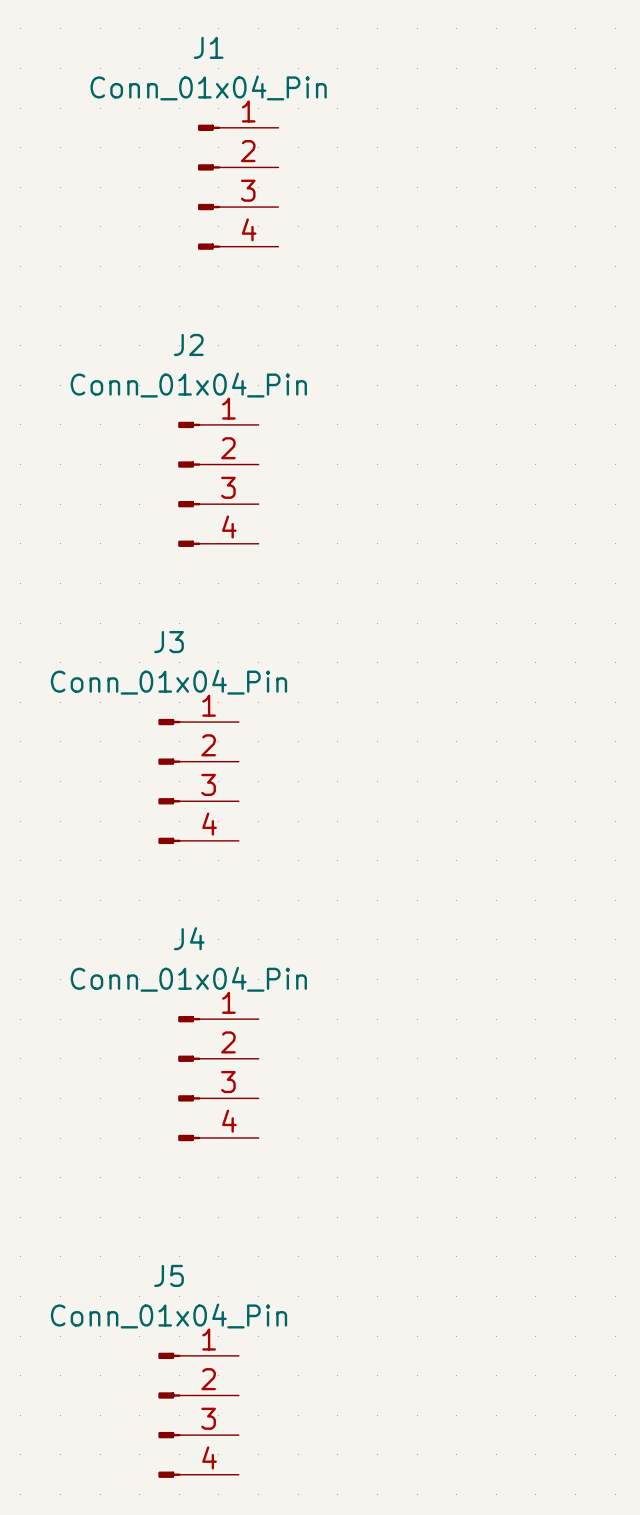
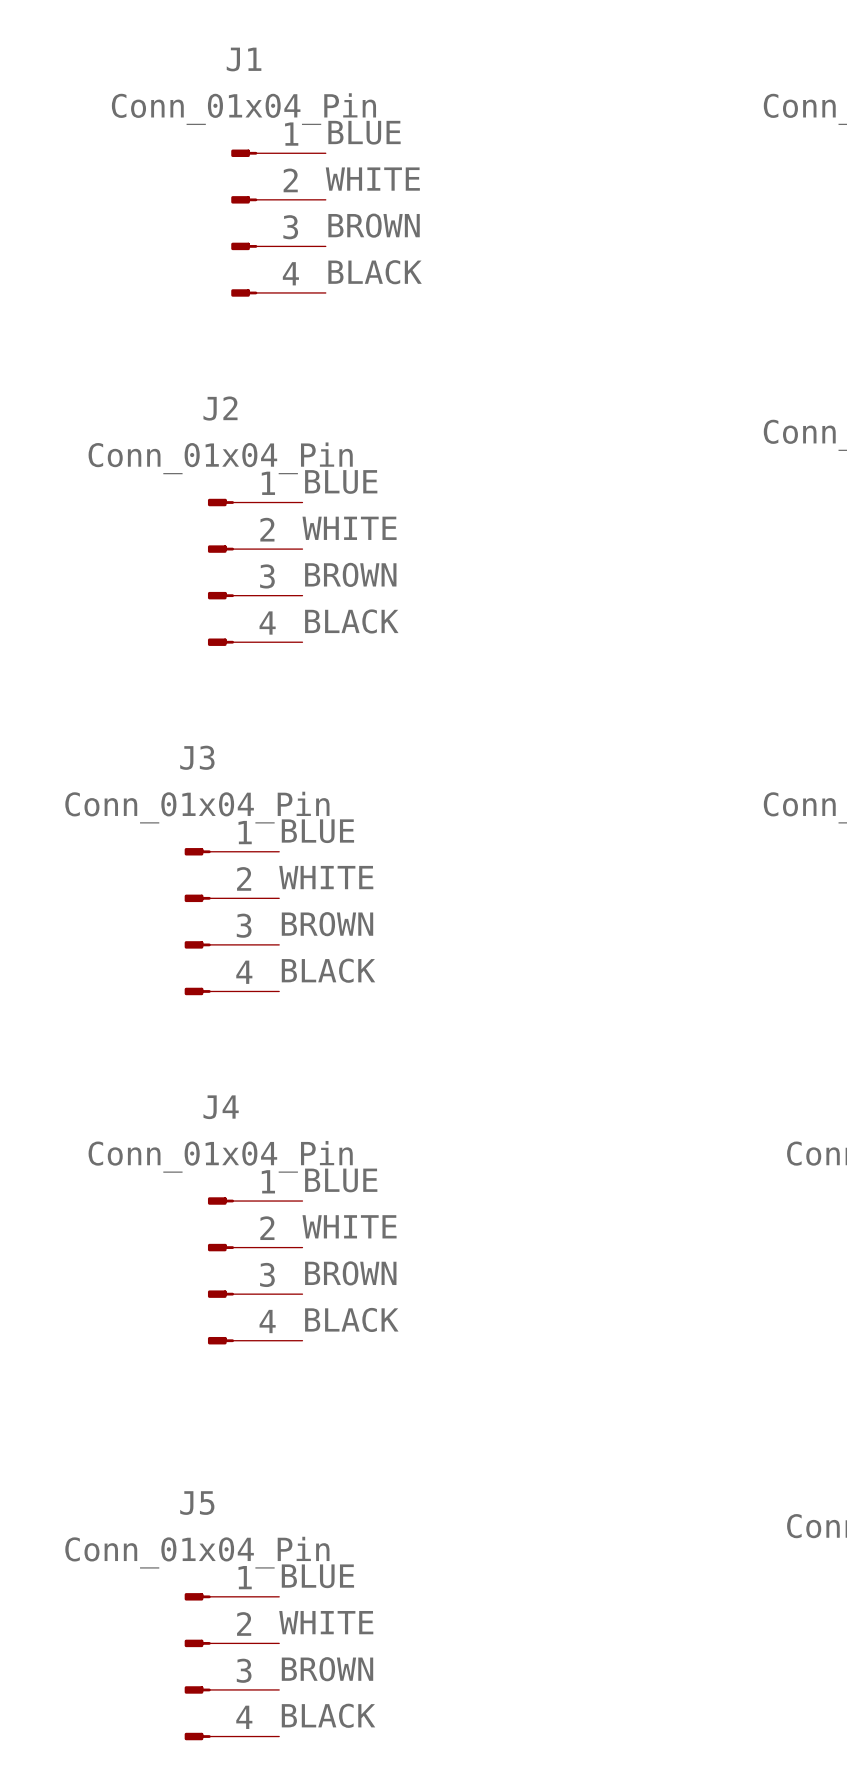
label: none -> BLUE (364, 132)
label: none -> WHITE (372, 179)
label: none -> BROWN (374, 225)
label: none -> BLACK (375, 272)
label: none -> BLUE (341, 481)
label: none -> WHITE (349, 528)
label: none -> BROWN (350, 574)
label: none -> BLACK (351, 621)
label: none -> BLUE (317, 831)
label: none -> WHITE (326, 877)
label: none -> BROWN (327, 924)
label: none -> BLACK (328, 970)
label: none -> BLUE (341, 1180)
label: none -> WHITE (349, 1226)
label: none -> BROWN (350, 1273)
label: none -> BLACK (351, 1319)
label: none -> BLUE (317, 1576)
label: none -> WHITE (326, 1622)
label: none -> BROWN (327, 1669)
label: none -> BLACK (328, 1715)

